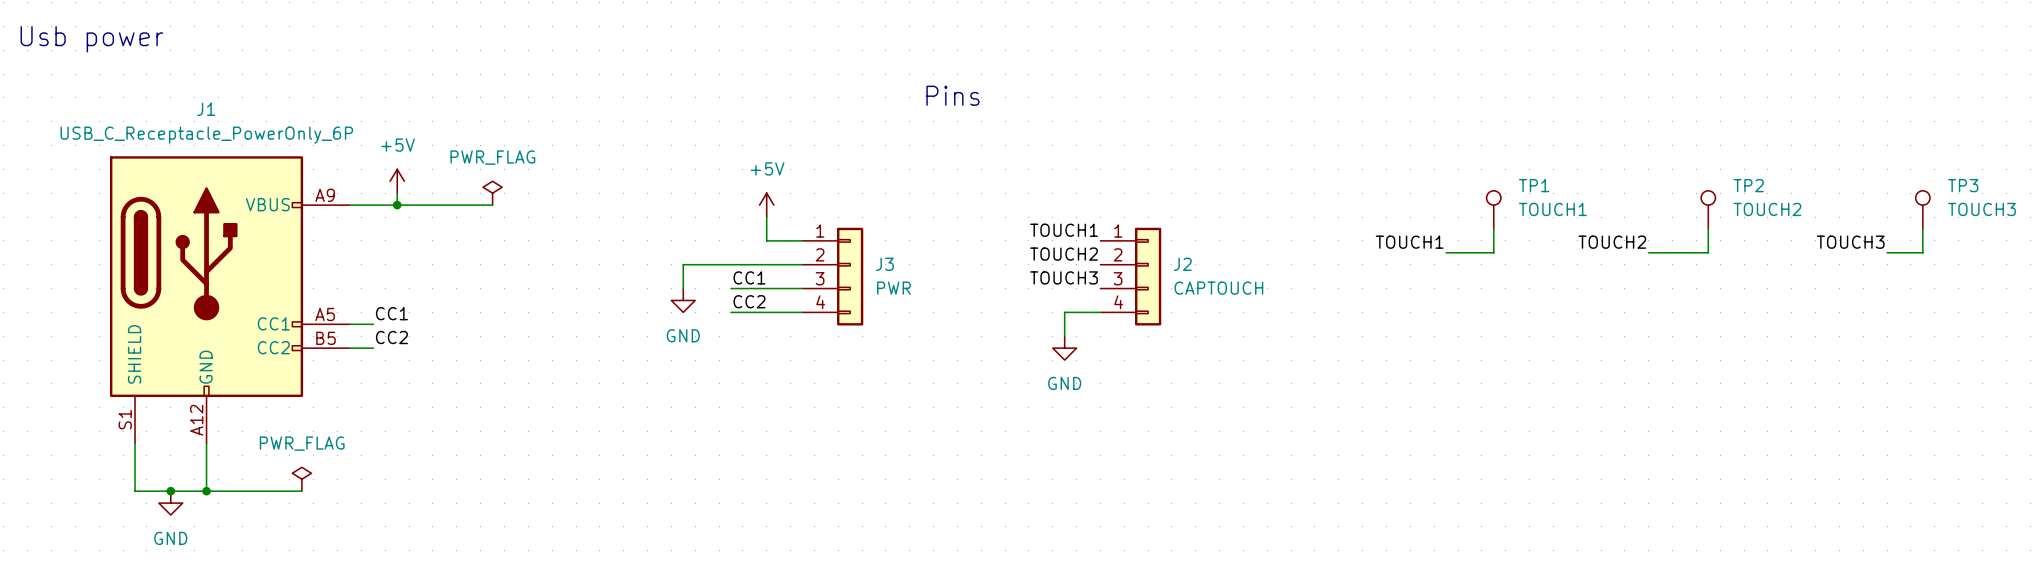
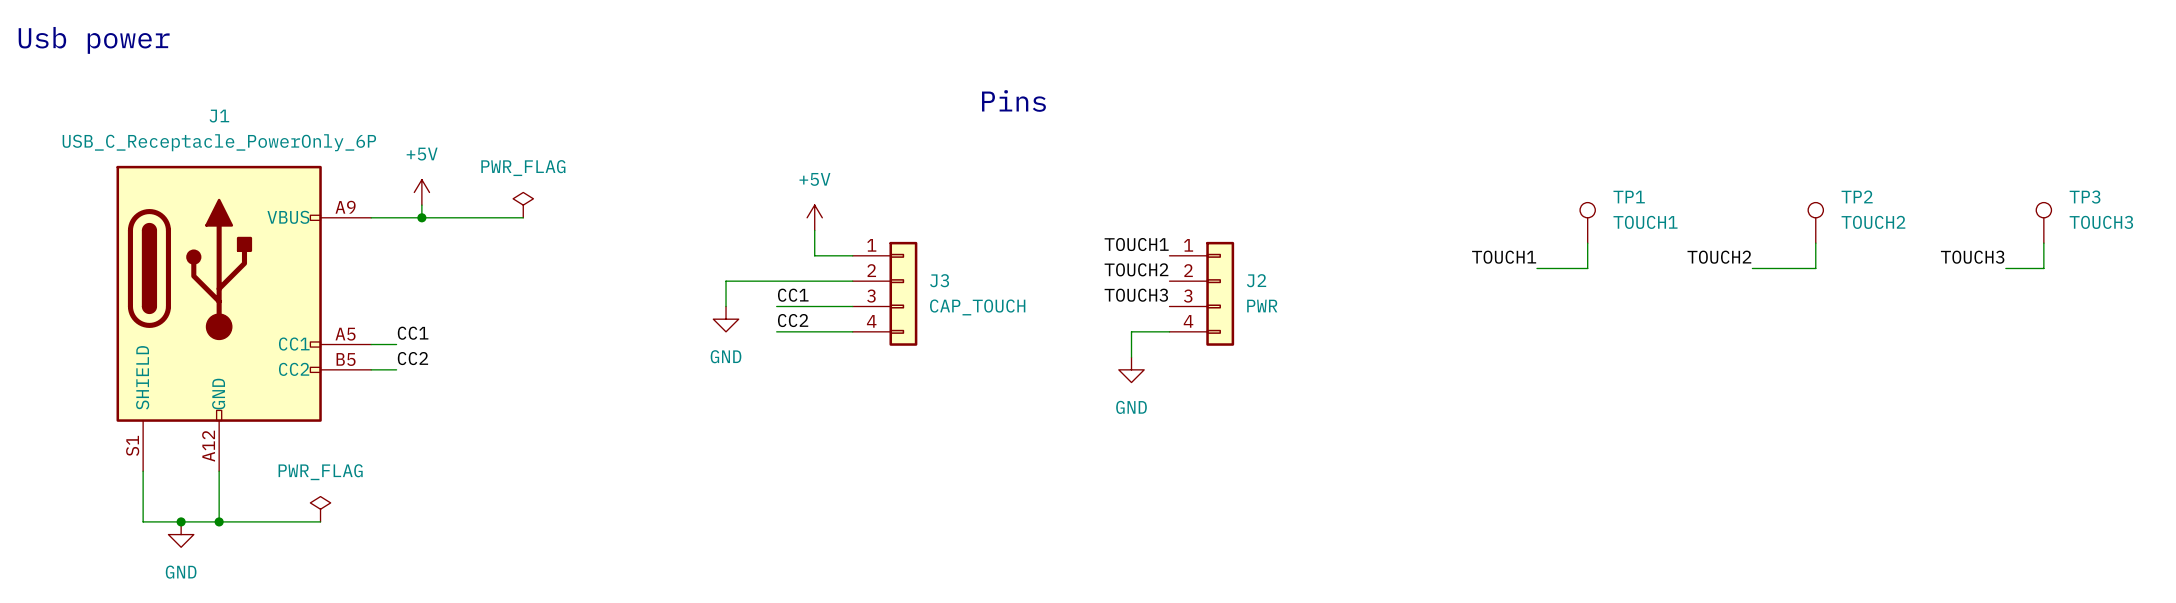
J3 value: PWR (893, 288) -> CAP_TOUCH (977, 307)
J2 value: CAPTOUCH (1218, 288) -> PWR (1262, 306)

